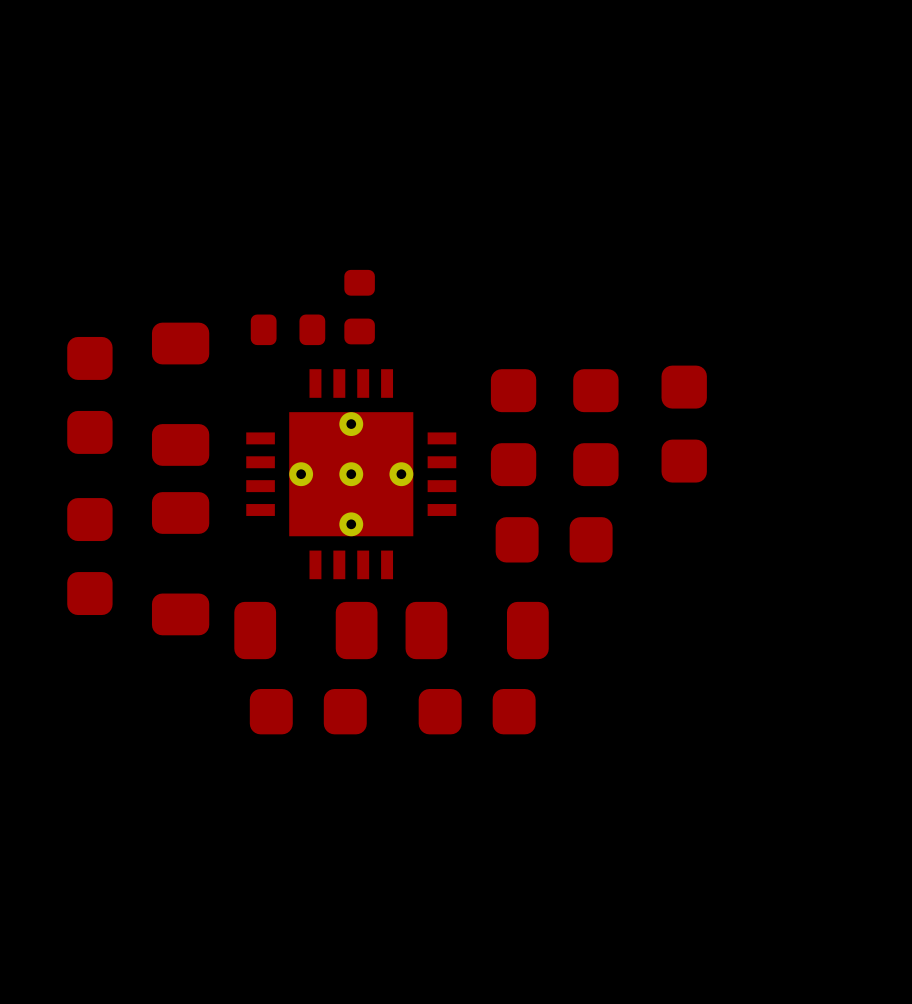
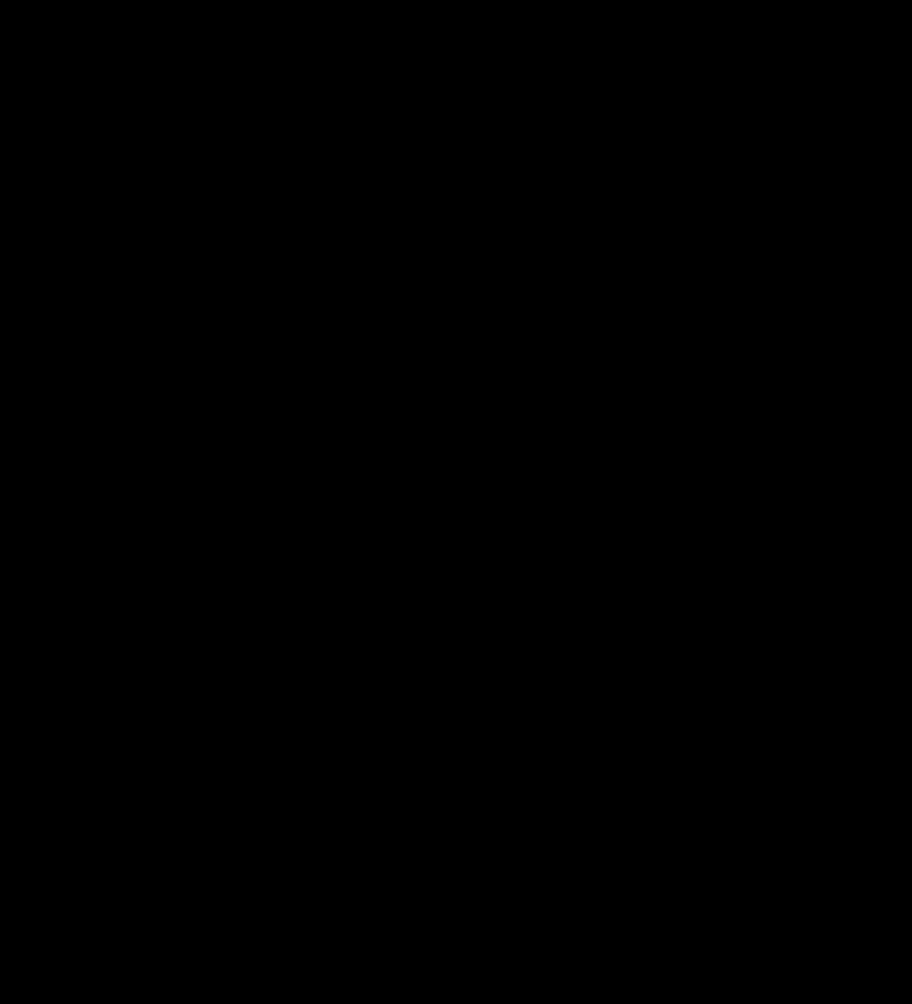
part: (359, 307) -> none
part: (288, 329) -> none
part: (180, 394) -> none
part: (89, 395) -> none
part: (684, 424) -> none
part: (513, 427) -> none
part: (595, 427) -> none
part: (351, 474) -> none
part: (554, 539) -> none
part: (89, 556) -> none
part: (180, 563) -> none
part: (305, 630) -> none
part: (477, 630) -> none
part: (308, 711) -> none
part: (477, 711) -> none

